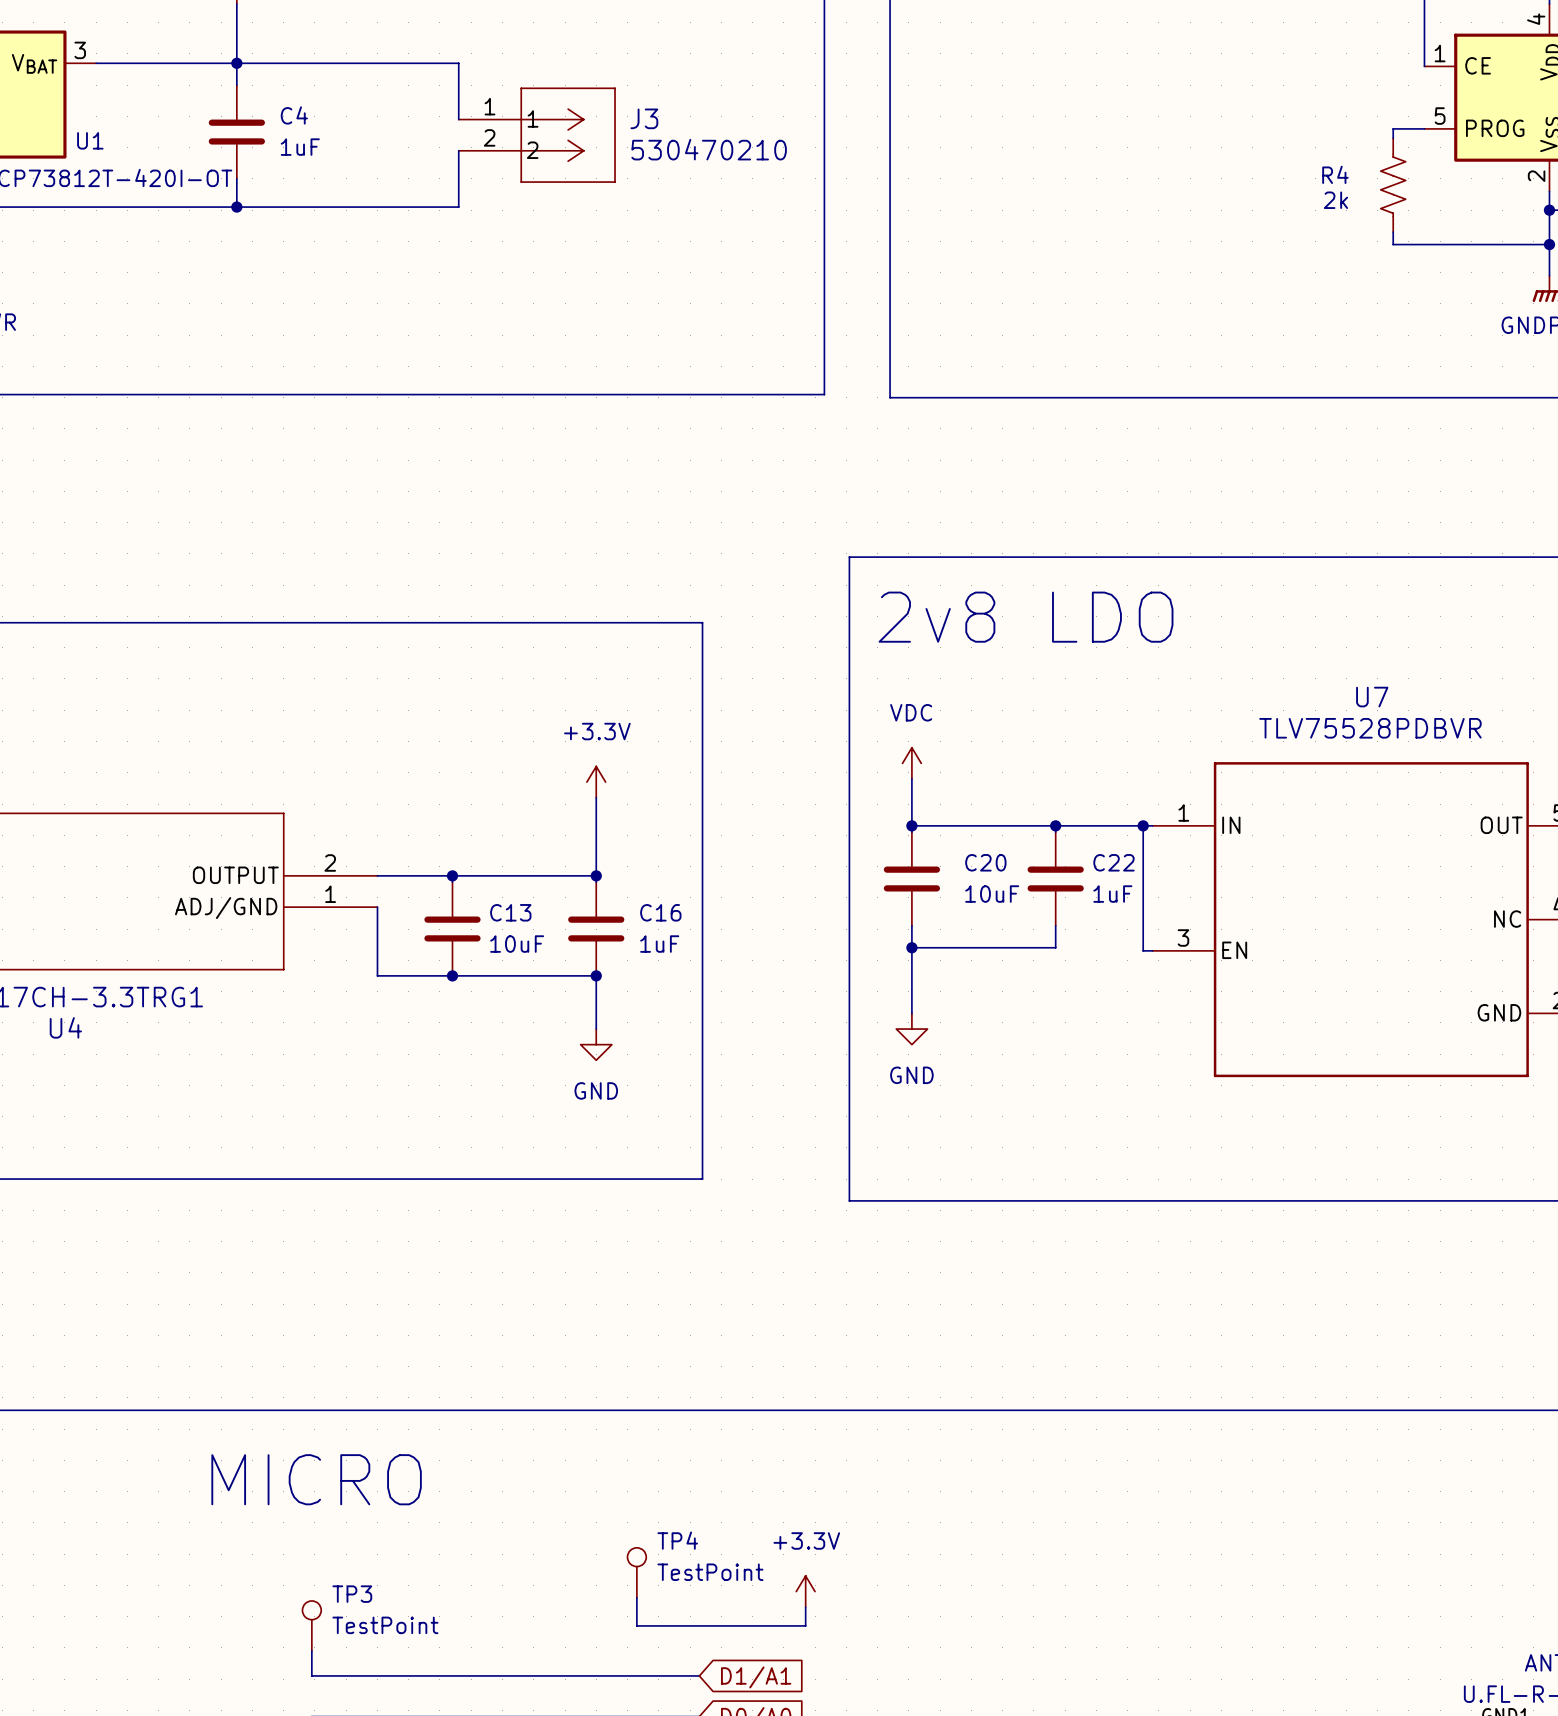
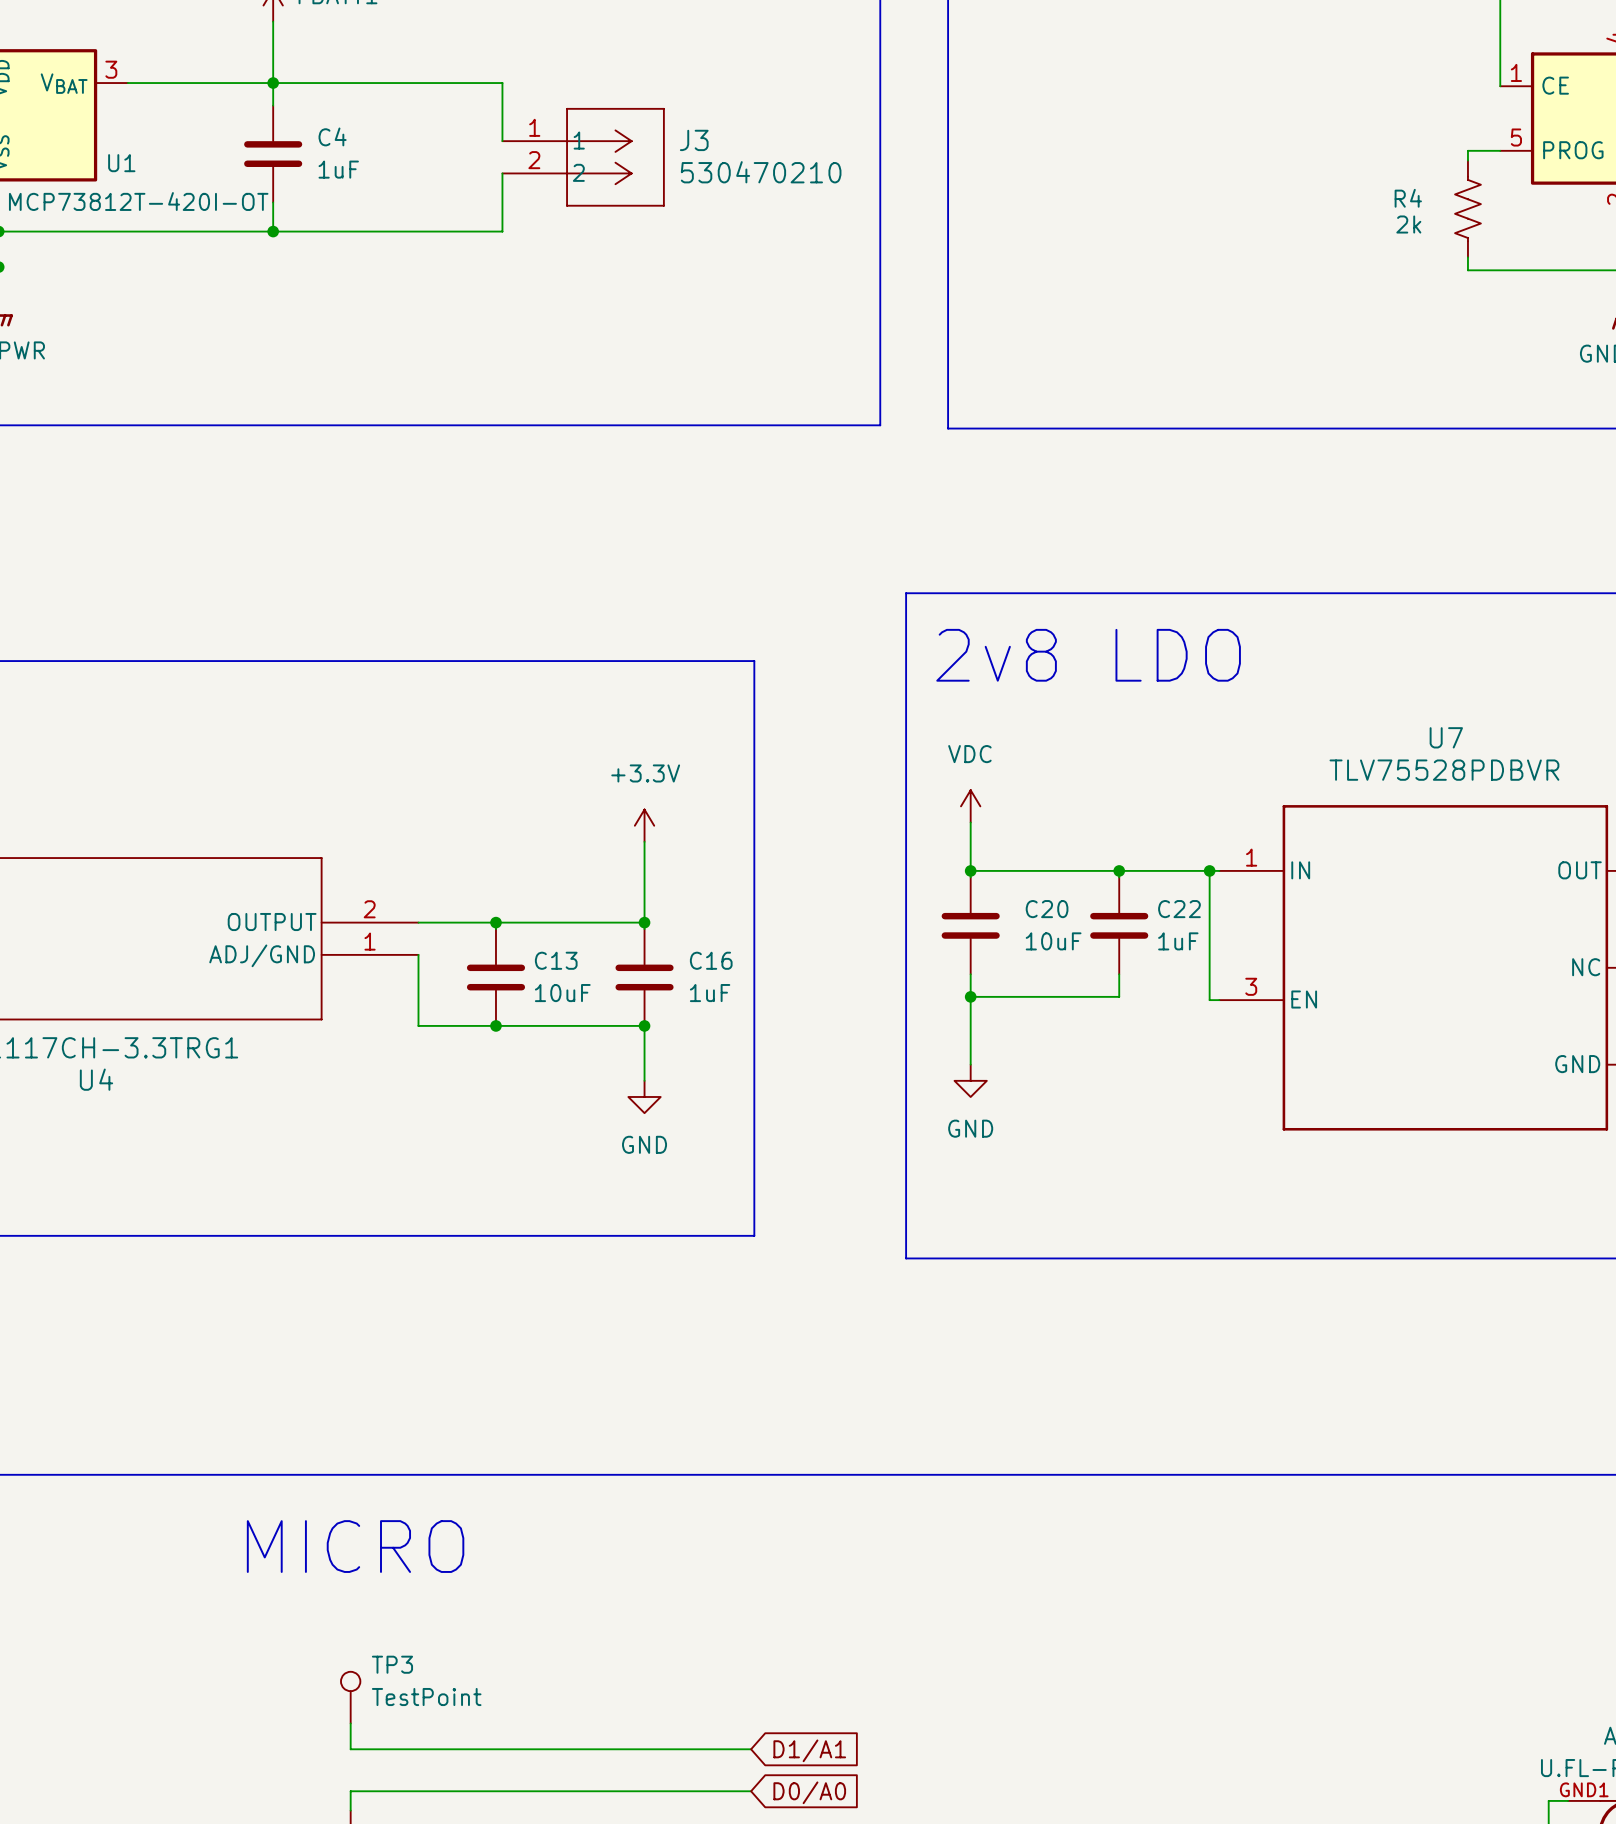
TP4: TestPoint (636, 1572) -> none
power symbol: +3.3V (805, 1591) -> none
wire: (636, 1597) (636, 1625) (805, 1625) (805, 1607) -> none

